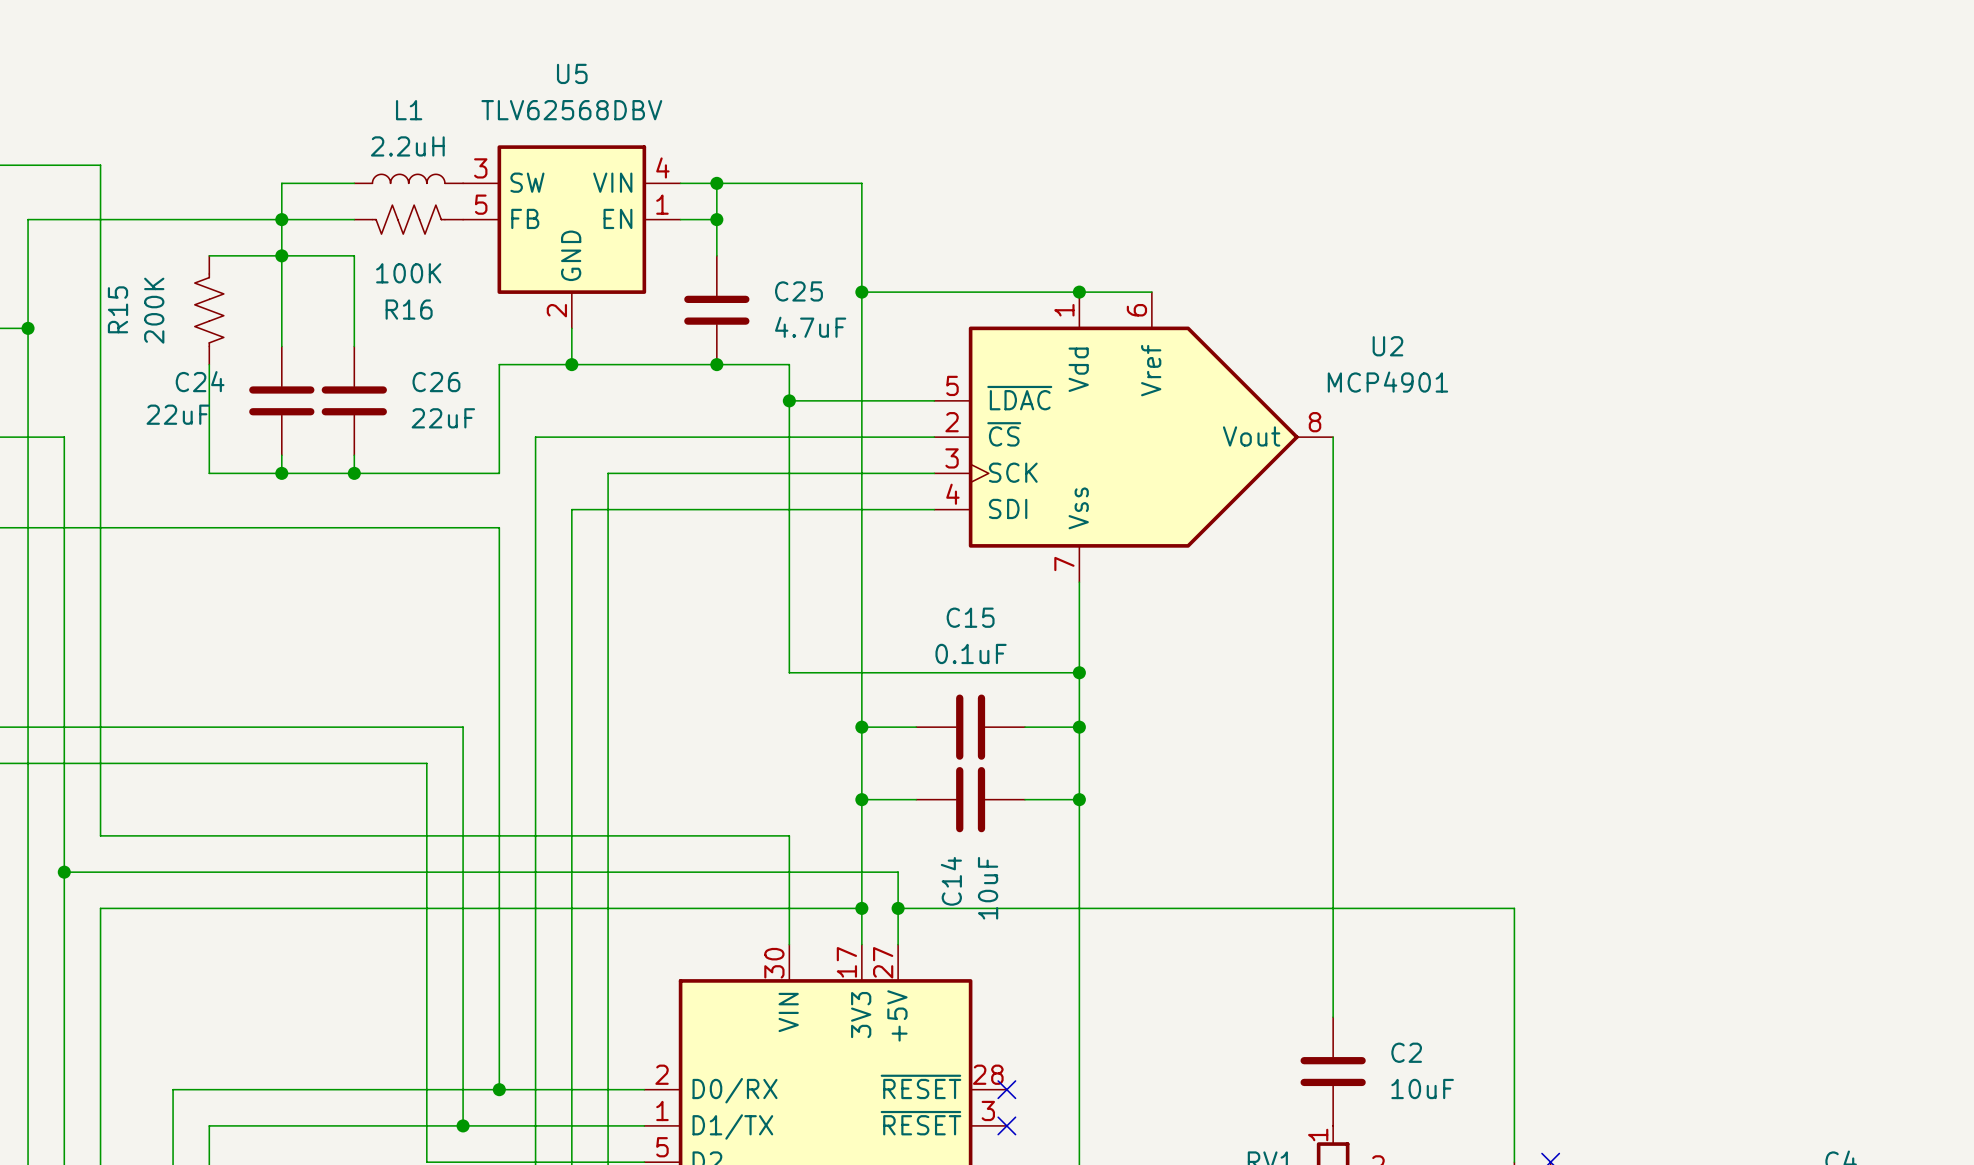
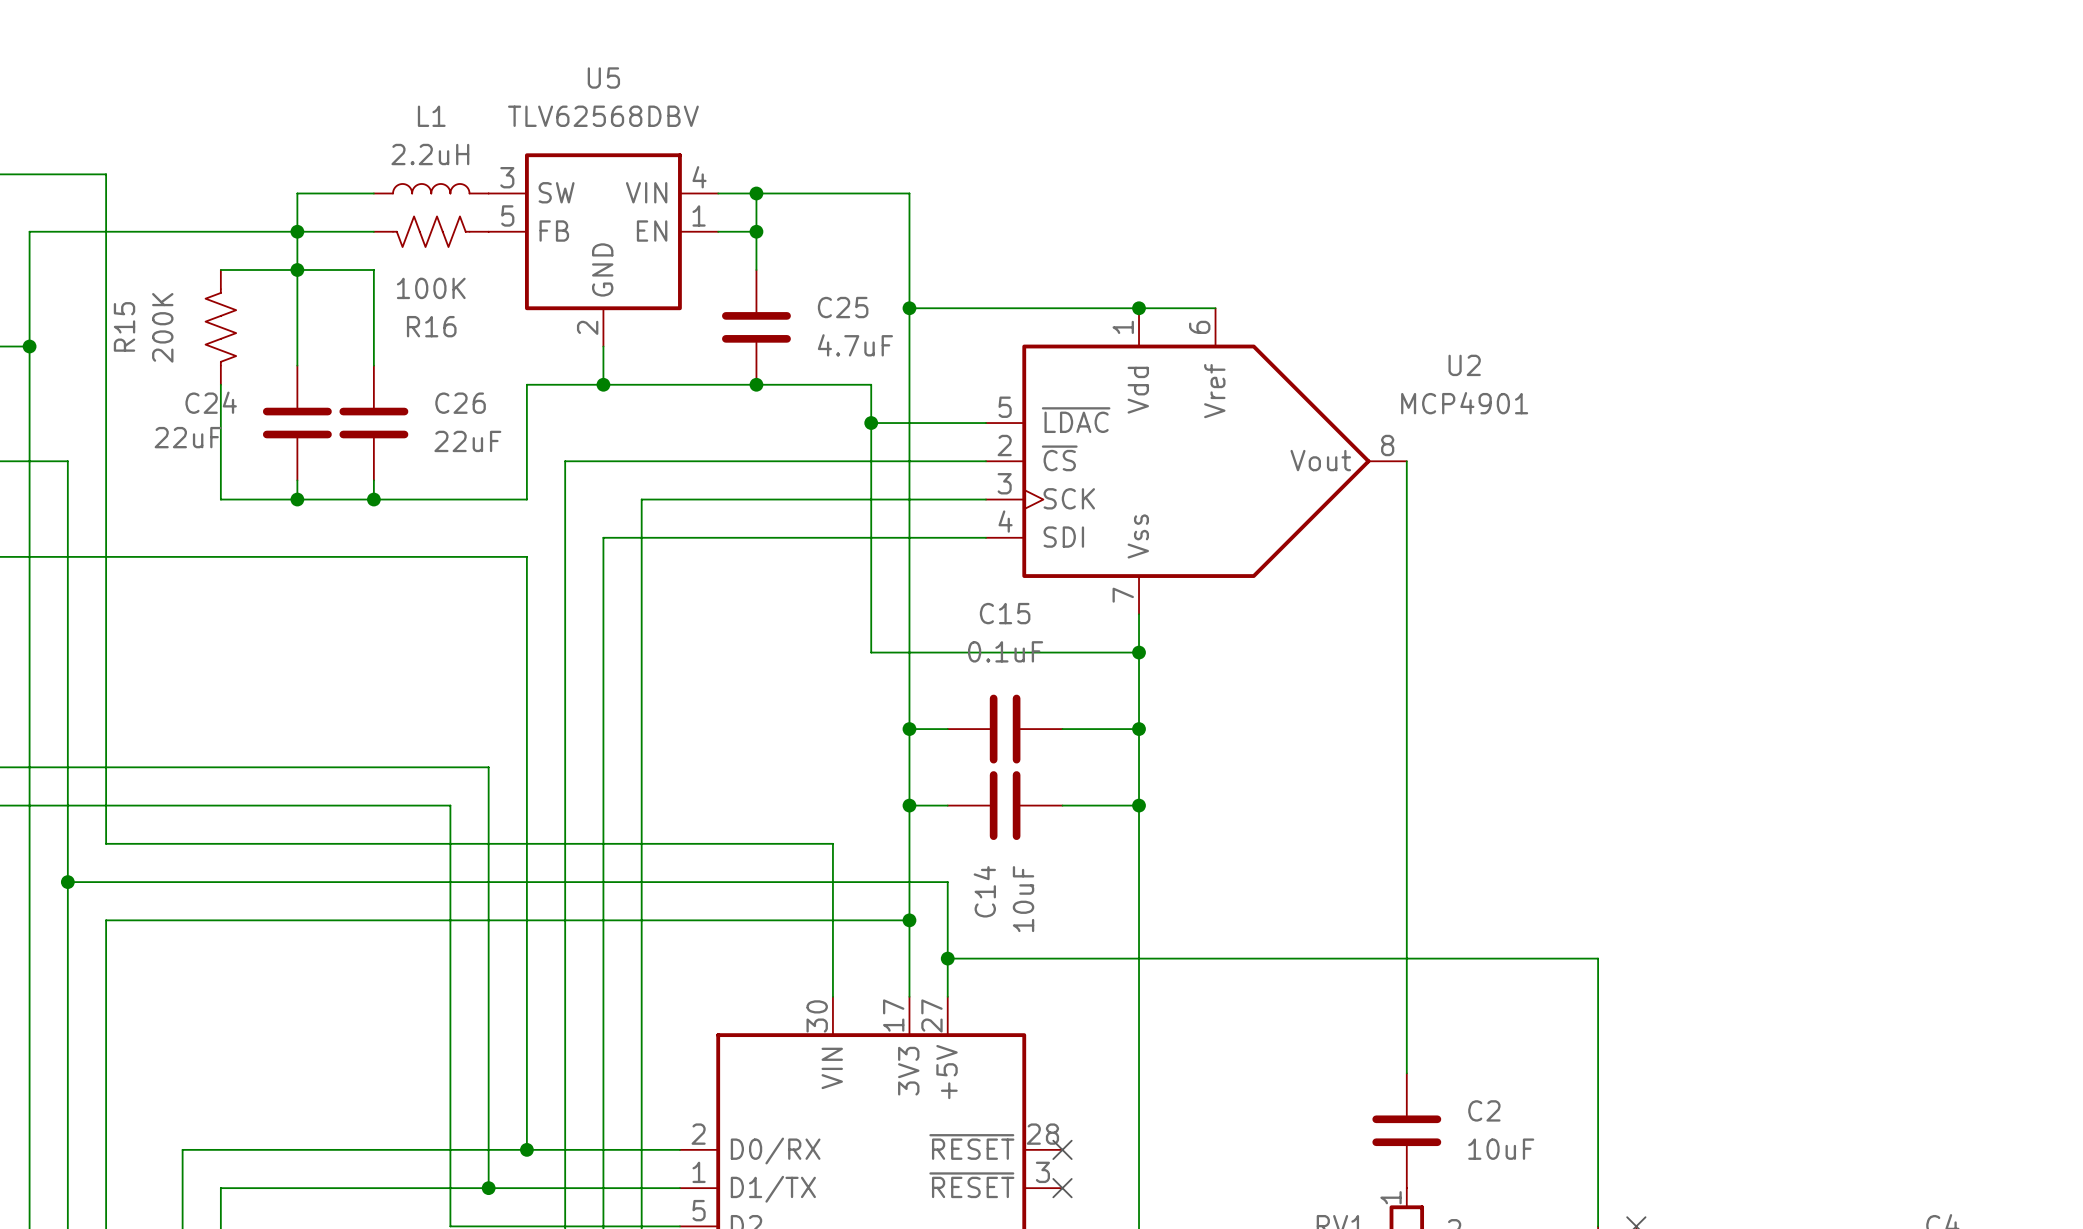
wire: (789, 364) (789, 672) (1079, 672) -> (832, 384) (871, 384) (871, 652) (1139, 652)
wire: (789, 400) (825, 400) -> (909, 729) (947, 729)
junction position: (789, 400) -> (871, 423)
junction: none -> (1139, 652)
junction: (1079, 672) -> none
junction: none -> (909, 729)
wire: none -> (1062, 729) (1139, 729)
junction: none -> (1139, 729)
wire: (861, 727) (916, 727) -> none
junction: (861, 727) -> none
C15 position: (970, 727) -> (1005, 729)
wire: (1024, 727) (1079, 727) -> none
junction: (1079, 727) -> none
wire: none -> (909, 805) (947, 805)
junction: none -> (909, 805)
wire: none -> (1062, 805) (1139, 805)
junction: none -> (1139, 805)
wire: (100, 799) (100, 835) -> (67, 882) (106, 882)
wire: (861, 799) (916, 799) -> none
junction: (861, 799) -> none
C14 position: (970, 799) -> (1005, 805)
wire: (1024, 799) (1079, 799) -> none
junction: (1079, 799) -> none
wire: (64, 872) (100, 872) -> (106, 958) (106, 920)
junction position: (64, 872) -> (67, 882)
wire: (861, 872) (898, 872) -> (106, 843) (832, 843) (832, 882) (947, 882) (947, 920)
junction: none -> (909, 920)
wire: (100, 908) (861, 908) -> none
junction: (861, 908) -> none

